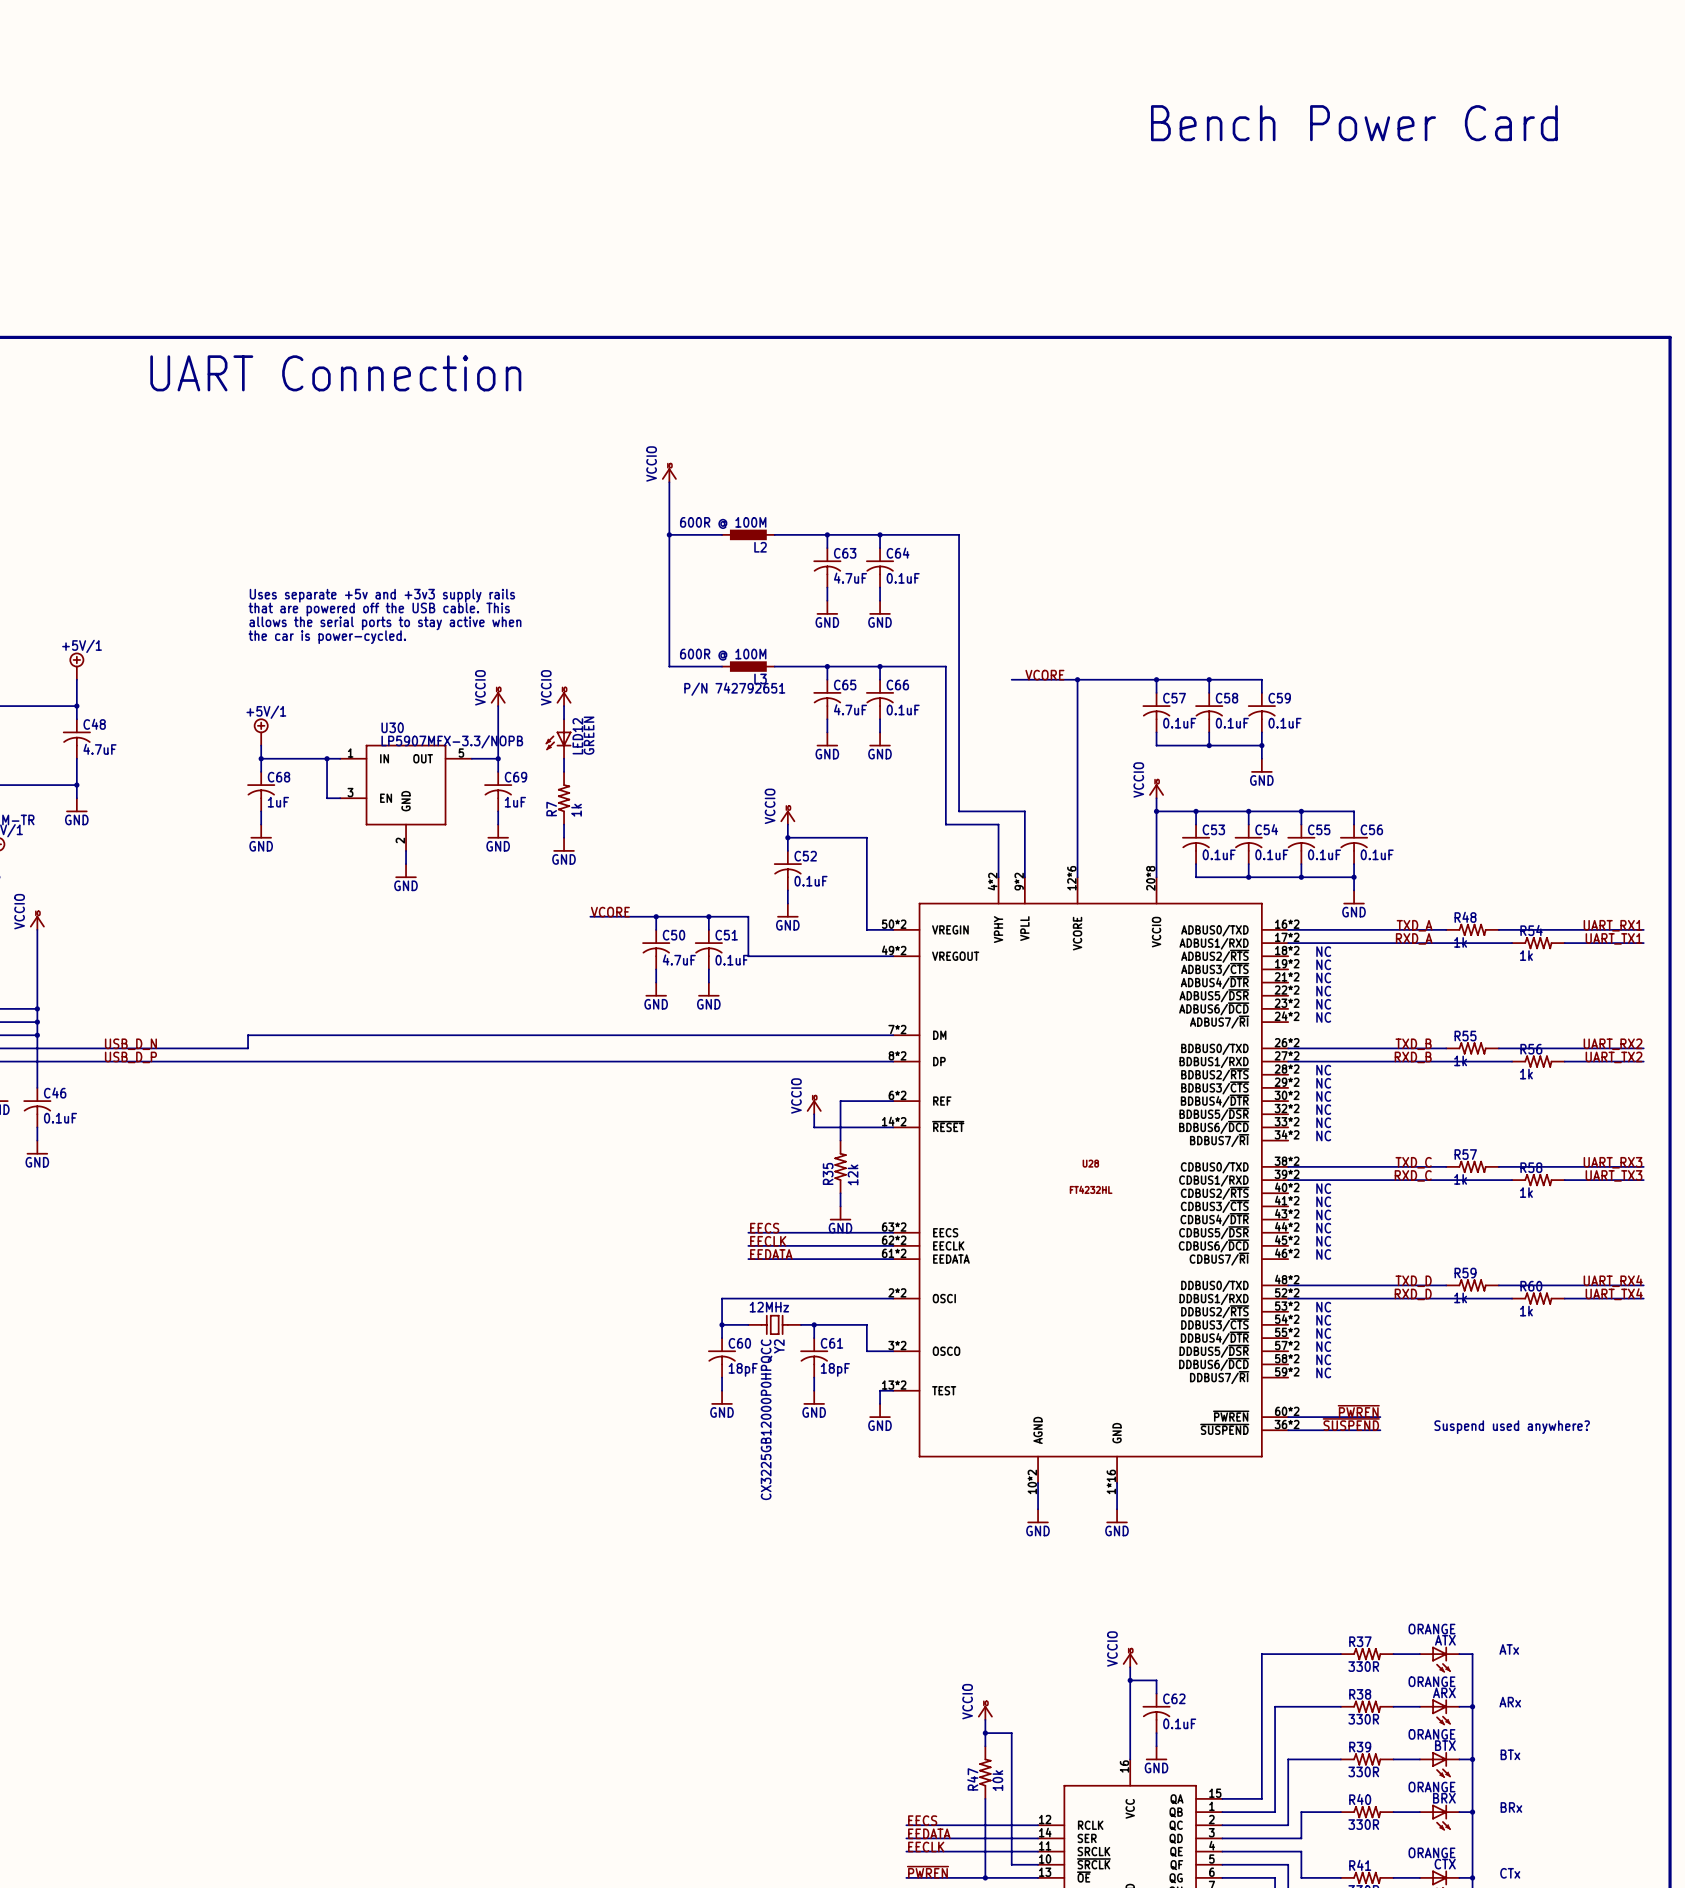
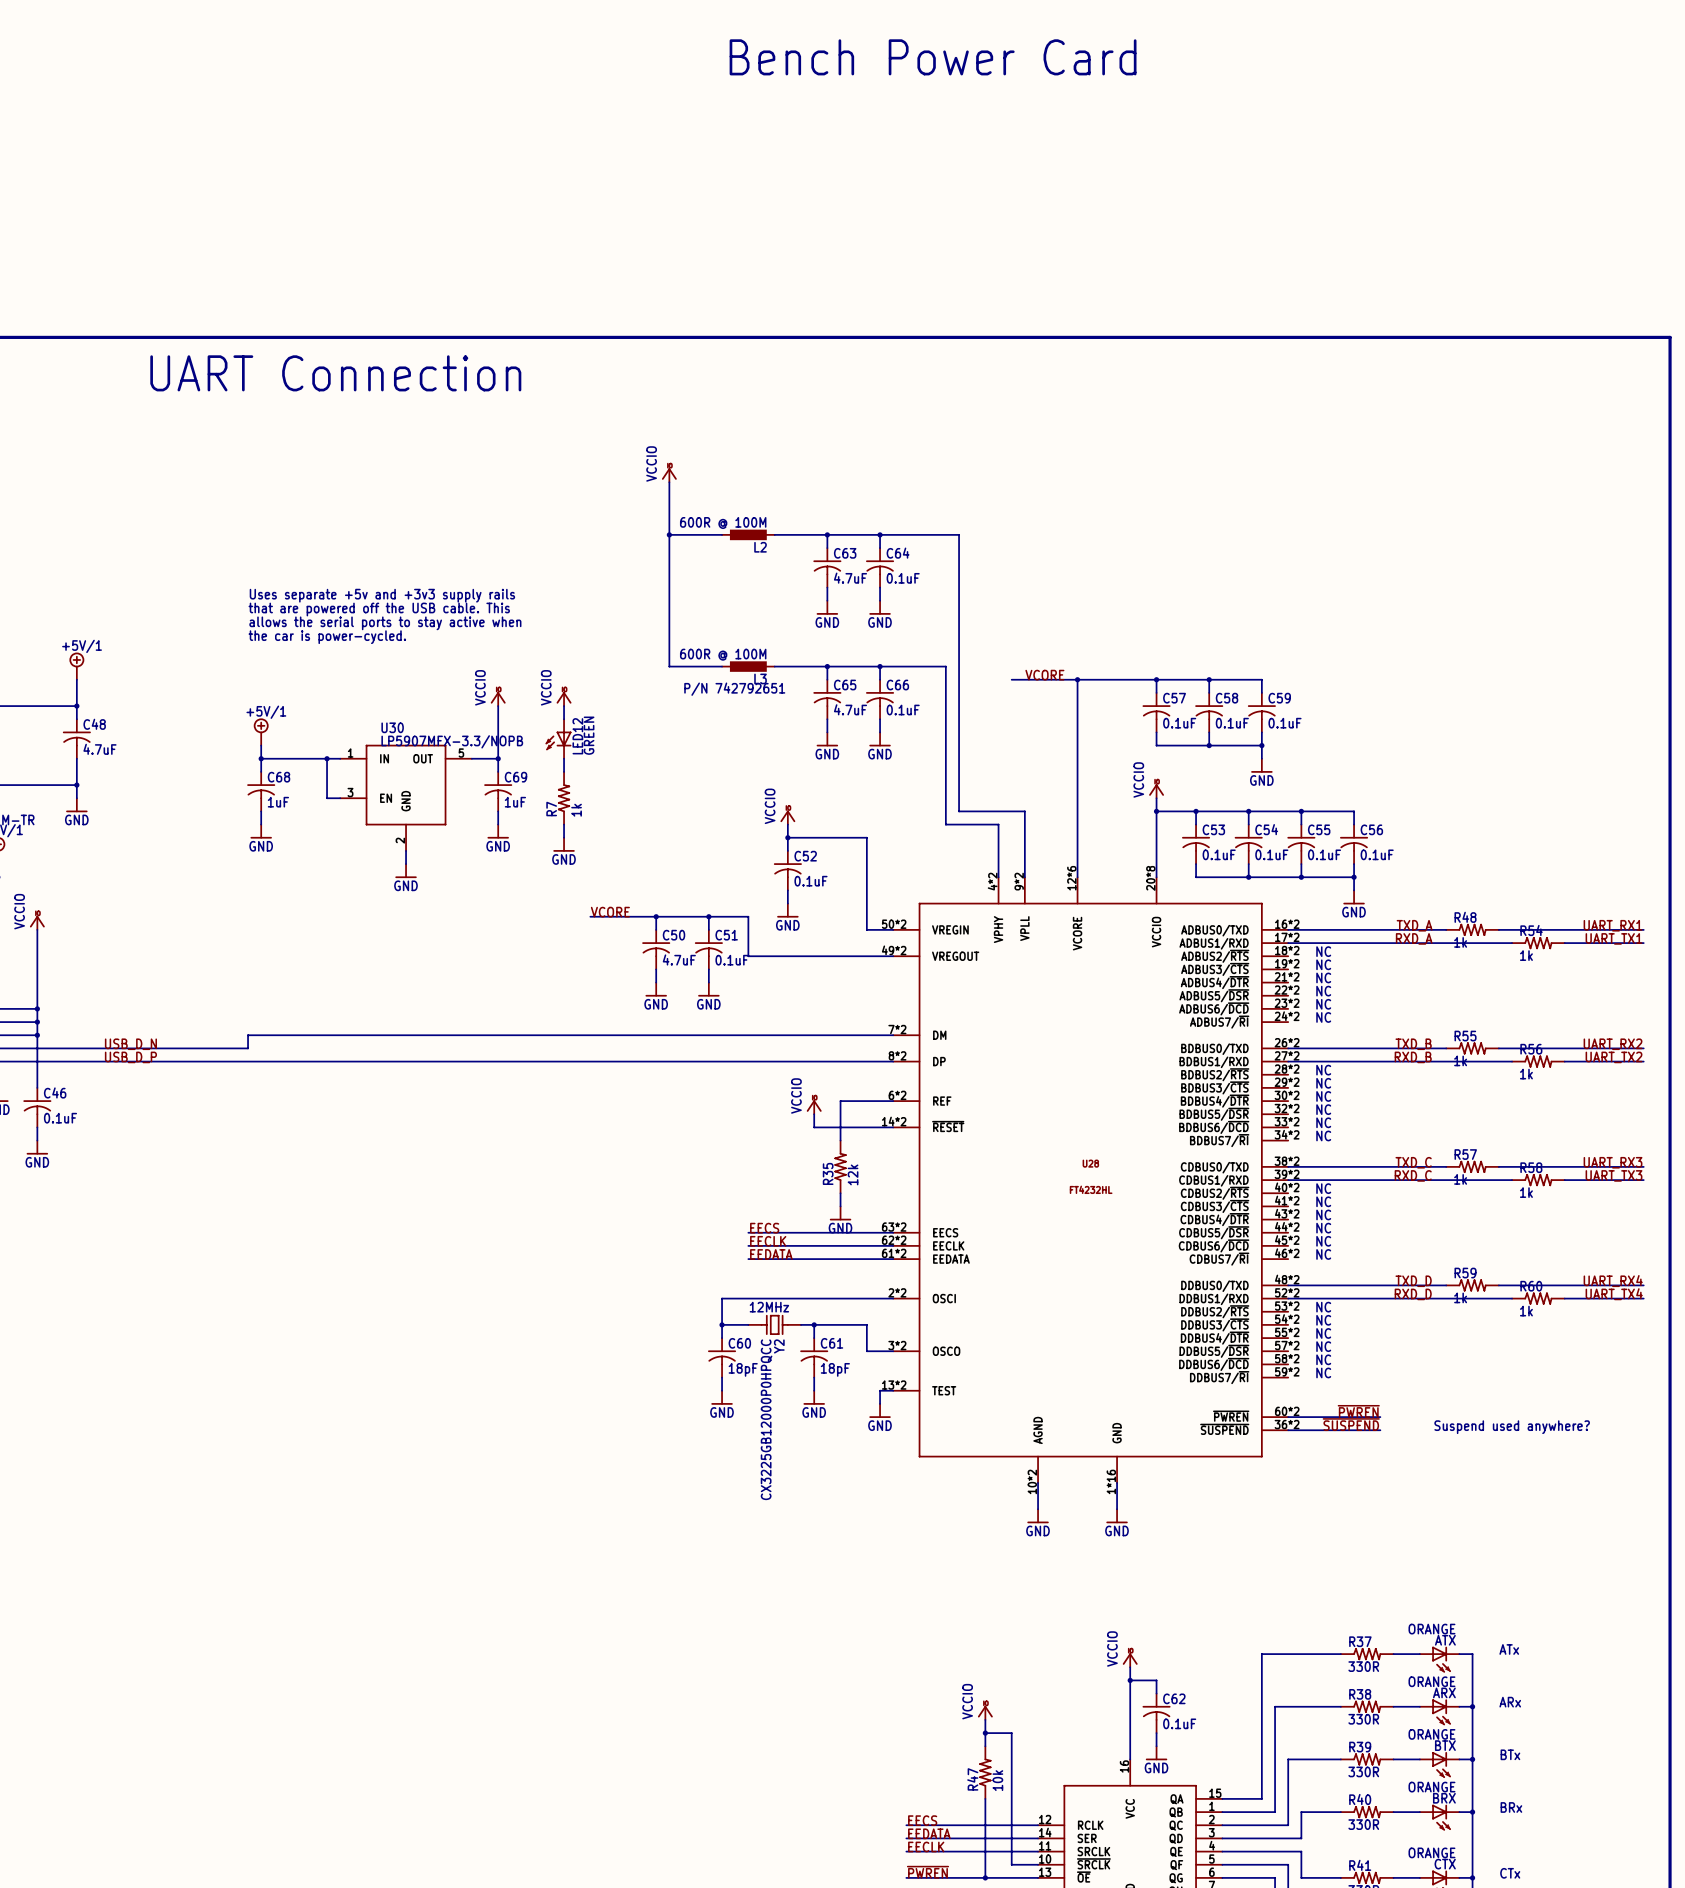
text: none -> Bench Power Card (933, 57)
text: Bench Power Card (1354, 123) -> none

